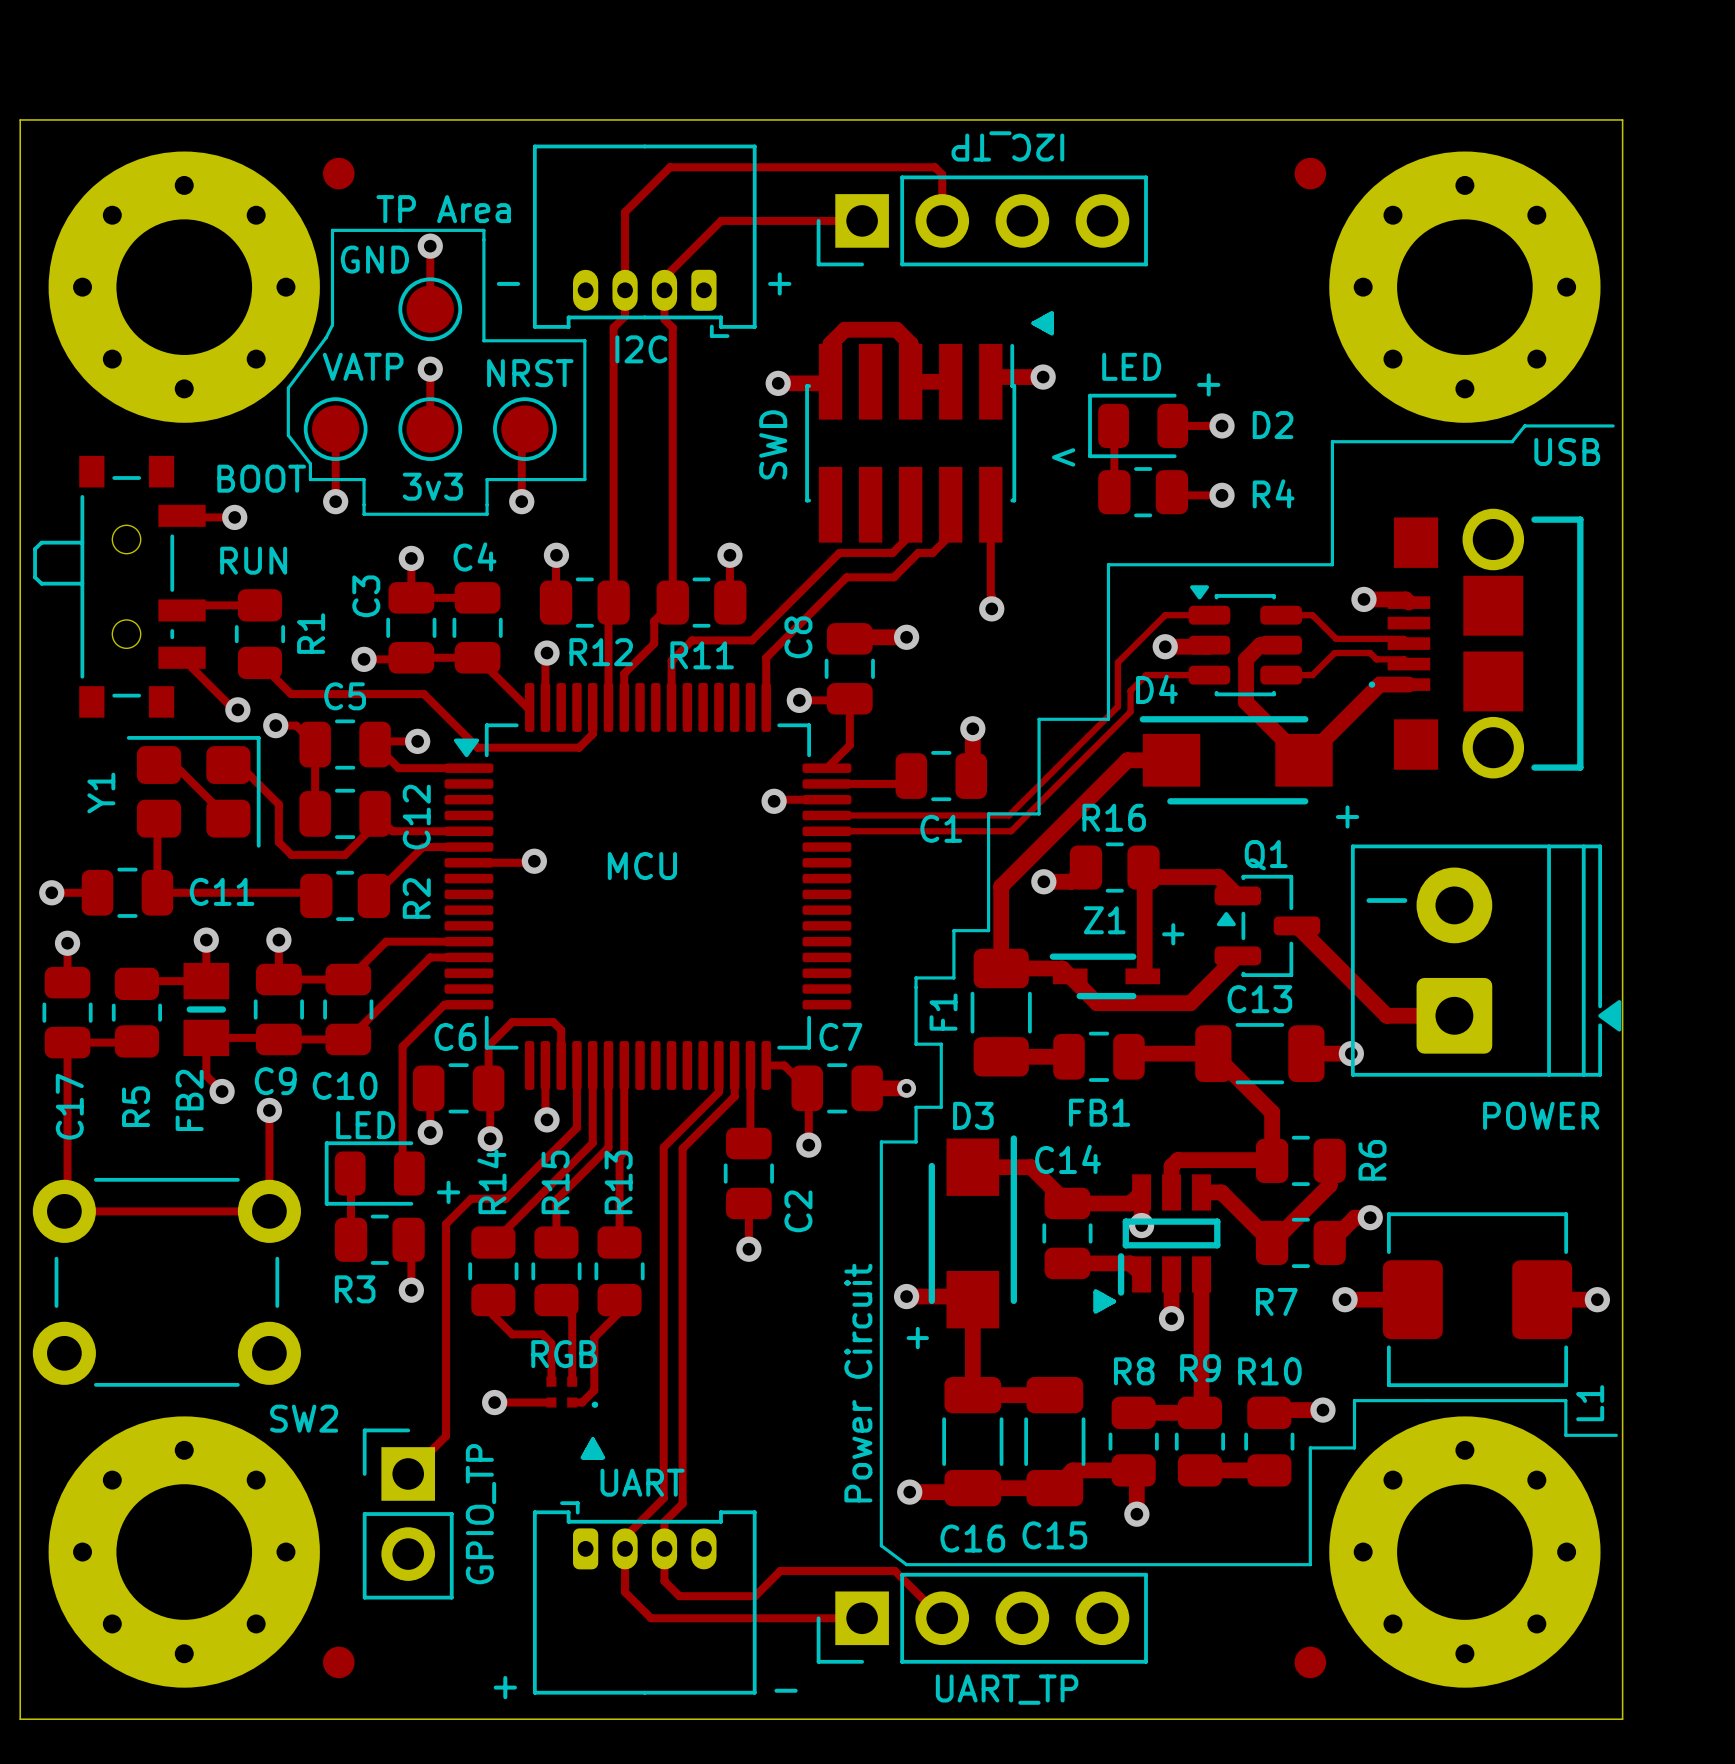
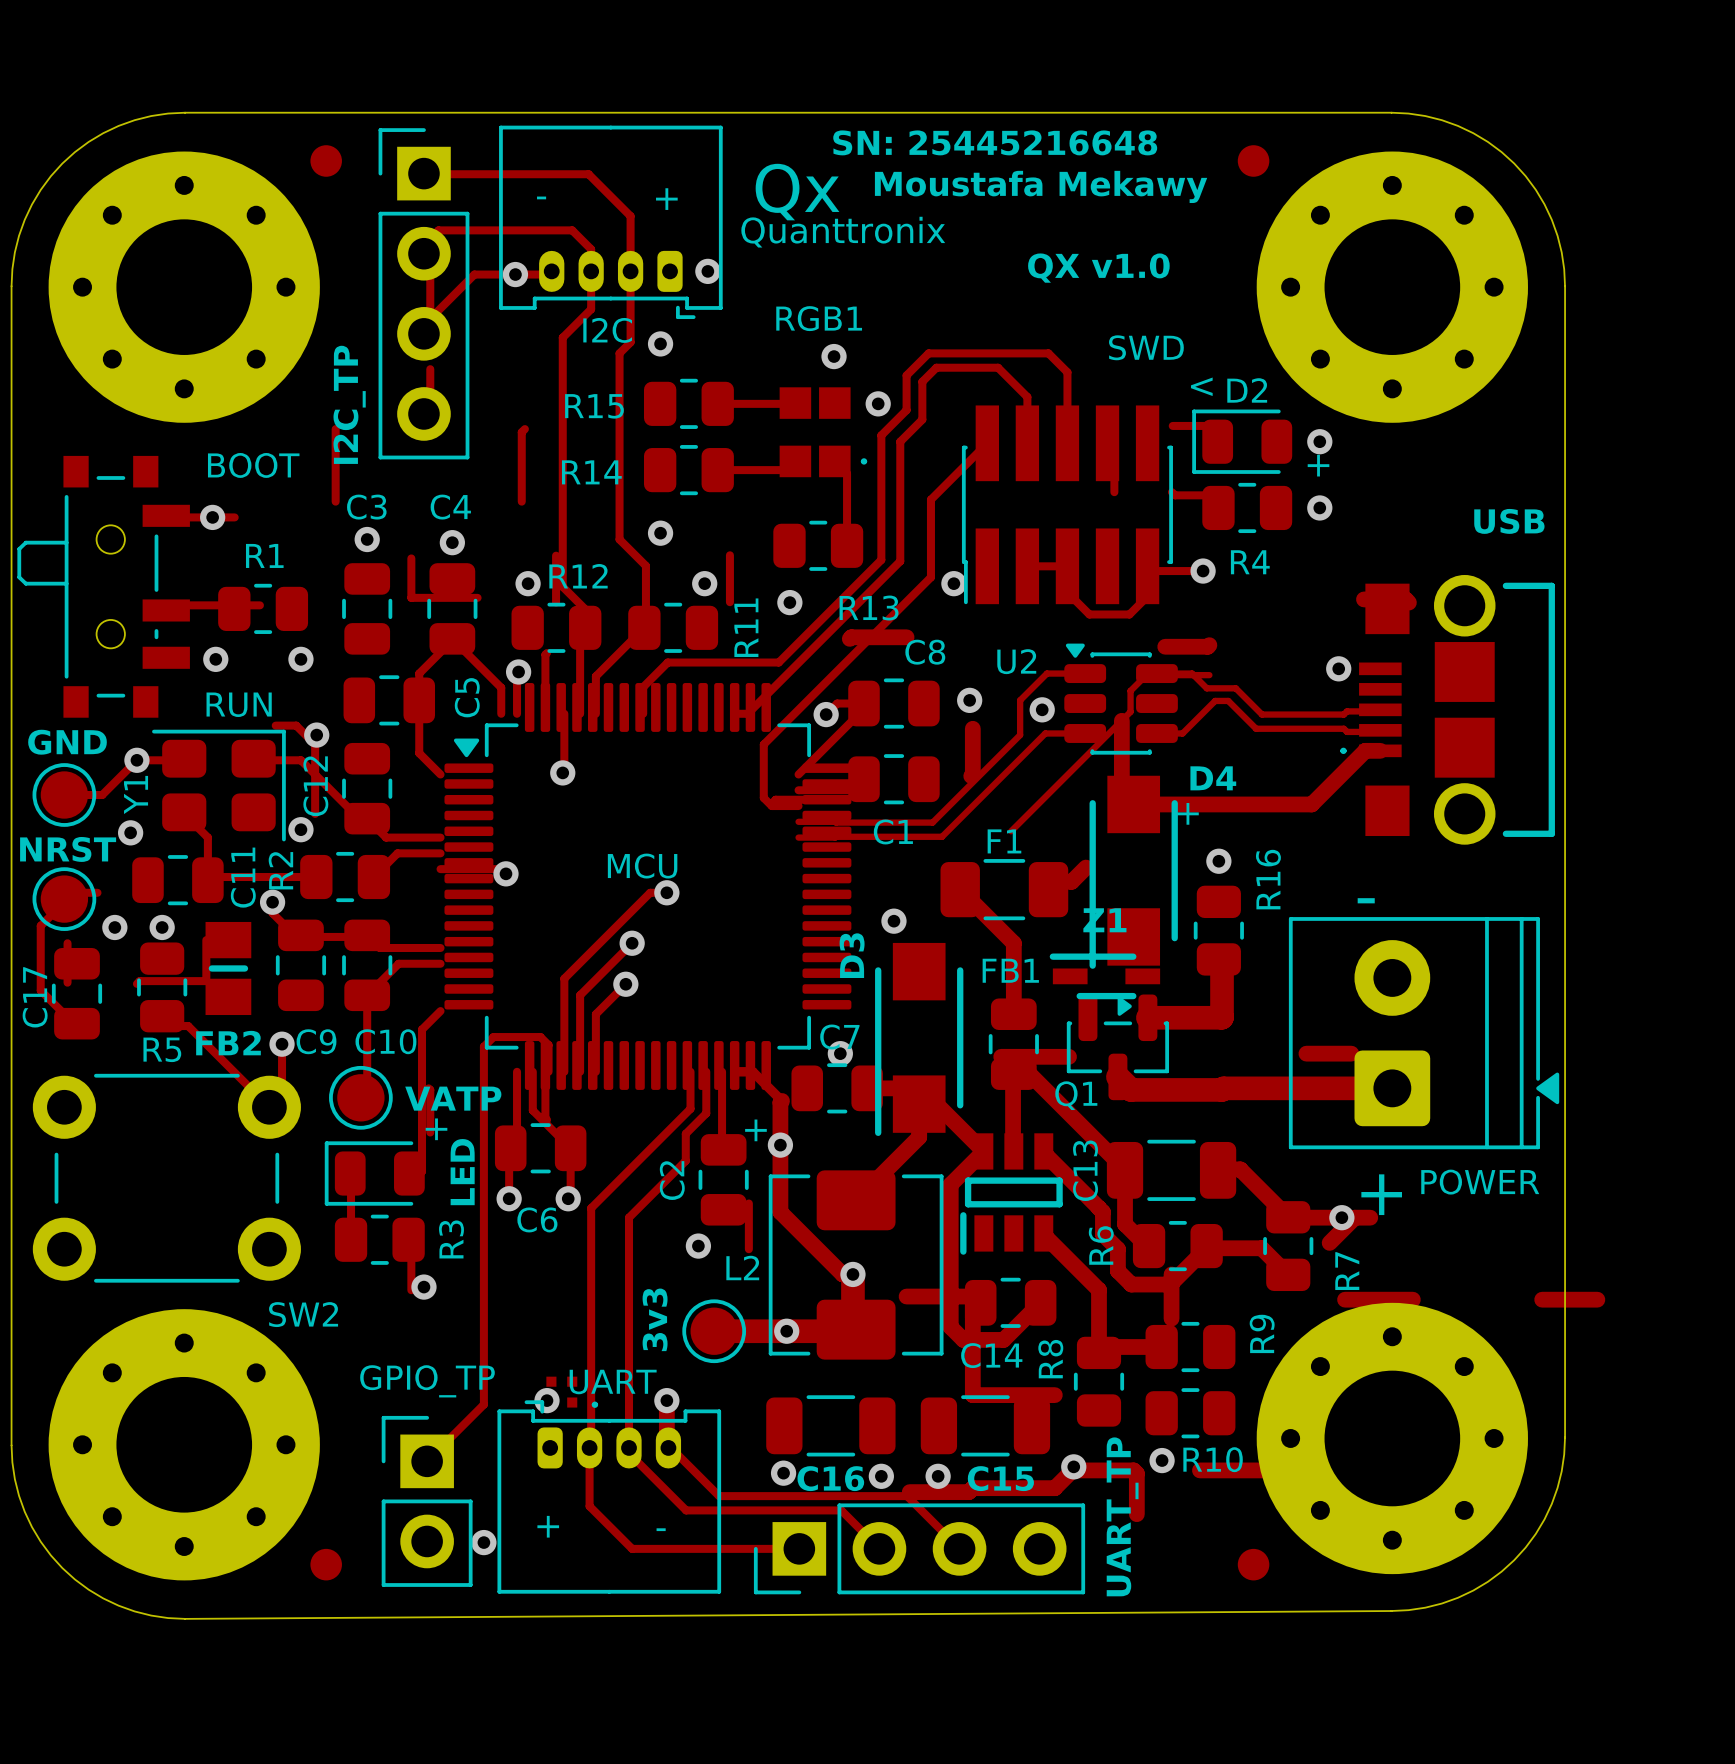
board edge: (20, 119) (1622, 119) (1622, 1719) (20, 1719) (20, 119) -> (185, 112) (168, 113) (134, 120) (103, 133) (74, 152) (50, 176) (32, 204) (19, 235) (12, 269) (11, 1445) (14, 1479) (24, 1511) (40, 1541) (62, 1568) (88, 1589) (118, 1605) (151, 1615) (185, 1618) (1391, 1611) (1425, 1607) (1457, 1597) (1487, 1581) (1514, 1560) (1535, 1533) (1551, 1503) (1561, 1471) (1565, 1437) (1565, 286) (1561, 252) (1551, 219) (1535, 189) (1514, 163) (1487, 141) (1457, 125) (1425, 116) (1391, 112) (185, 112)
text: none -> SN: 25445216648 (995, 142)
text rotation: 0° (1007, 146) -> 90° clockwise (349, 404)
text position: I2C_TP (1007, 146) -> I2C_TP (349, 404)
part position: (338, 173) -> (326, 160)
track: none -> (423, 173) (588, 174) (630, 216) (630, 342) (619, 353) (619, 539) (645, 565) (645, 623) (644, 627) (595, 676) (595, 713)
part position: (1310, 173) -> (1253, 160)
text: none -> Moustafa Mekawy (1041, 186)
text: none -> Qx (797, 192)
text: TP Area (443, 209) -> none
track: (862, 220) (721, 220) (664, 277) (664, 319) (672, 327) (672, 602) (654, 621) (654, 643) (624, 673) (624, 707) -> none
track: (942, 220) (942, 174) (934, 167) (670, 167) (625, 212) (625, 316) (613, 327) (613, 602) (608, 607) (608, 707) -> none
part: (982, 220) -> none
line: (332, 230) (483, 230) (483, 340) (584, 340) (584, 479) (487, 479) (487, 514) (364, 514) (364, 479) (310, 479) (310, 463) (288, 435) (288, 388) (326, 337) (332, 325) (332, 230) -> none
text: none -> Quanttronix (843, 232)
part position: (644, 241) -> (610, 222)
via: (430, 246) -> none
track: none -> (423, 253) (423, 244) (438, 230) (572, 230) (591, 249) (591, 309) (562, 337) (562, 586) (585, 609) (585, 627) (580, 632) (580, 713)
text position: GND (374, 259) -> GND (67, 742)
text: none -> QX v1.0 (1098, 268)
track: none -> (551, 271) (548, 274) (474, 274) (423, 325) (423, 333)
via: none -> (707, 271)
via: none -> (515, 274)
part footprint: [398, 277, 463, 342] -> [378, 128, 470, 460]
text position: - (508, 283) -> - (541, 197)
text position: + (779, 283) -> + (666, 199)
part position: (1464, 287) -> (1392, 287)
text: ▲ (1042, 323) -> none
via: none -> (660, 343)
via: none -> (834, 356)
text position: VATP (363, 366) -> VATP (453, 1098)
text: LED (1131, 366) -> none
via: (430, 369) -> none
text position: NRST (530, 373) -> NRST (68, 849)
track: (1043, 377) (995, 377) (990, 381) -> none
via: (1043, 377) -> none
track: (950, 381) (910, 381) (910, 343) (896, 329) (844, 329) (830, 343) (830, 381) (828, 383) (778, 383) -> none
via: (778, 383) -> none
text position: + (1208, 384) -> + (1318, 465)
track: none -> (795, 403) (717, 403)
via: none -> (878, 403)
D2 position: (1138, 425) -> (1242, 441)
via: (1222, 425) -> none
D2 name position: D2 (1273, 425) -> D2 (1247, 390)
line: (1613, 425) (1524, 425) (1512, 441) (1332, 441) (1332, 564) (1108, 564) (1108, 719) (1039, 719) (1039, 813) (988, 813) (988, 930) (953, 930) (953, 977) (916, 977) (916, 1044) (941, 1044) (941, 1107) (916, 1107) (916, 1141) (881, 1141) (881, 1545) (906, 1564) (1310, 1564) (1310, 1447) (1354, 1447) (1354, 1400) (1565, 1400) (1565, 1435) (1616, 1435) -> none
part: (335, 429) -> none
part: (430, 429) -> none
part: (524, 429) -> none
RGB1: none -> (823, 432)
via: none -> (1319, 441)
part: (910, 443) -> none
track: none -> (987, 443) (930, 499) (930, 577) (763, 744) (763, 797) (771, 806) (798, 806)
track: none -> (1027, 443) (1027, 397) (998, 367) (936, 367) (922, 381) (922, 419) (900, 441) (900, 561) (747, 713) (737, 713)
track: none -> (1067, 443) (1067, 372) (1048, 353) (928, 353) (906, 375) (906, 410) (881, 435) (881, 559) (778, 662) (667, 662) (643, 687) (643, 713)
text position: USB (1567, 451) -> USB (1509, 521)
text position: < (1063, 457) -> < (1201, 386)
track: none -> (795, 461) (785, 470) (717, 470)
track: none -> (834, 461) (847, 473) (847, 545)
part text position: BOOT (261, 478) -> BOOT (253, 465)
text: 3v3 (432, 486) -> none
R4 position: (1143, 492) -> (1247, 507)
R4 name position: R4 (1273, 493) -> R4 (1250, 562)
via: (1222, 495) -> none
via: (335, 501) -> none
via: (521, 501) -> none
track: (910, 504) (910, 534) (892, 552) (839, 552) (752, 640) (692, 640) (671, 660) (671, 707) -> none
track: (950, 504) (950, 534) (932, 552) (918, 552) (893, 577) (846, 577) (766, 657) (766, 707) -> none
track: (990, 504) (991, 608) -> none
part: none -> (1067, 504)
via: none -> (1319, 507)
via position: (234, 517) -> (212, 517)
via: none -> (660, 533)
via: none -> (367, 539)
via: none -> (452, 542)
via: (556, 555) -> none
via: (729, 555) -> none
C4 name position: C4 (475, 556) -> C4 (450, 507)
via: (411, 558) -> none
text position: RUN (253, 560) -> RUN (239, 704)
track: none -> (1027, 566) (1067, 566) (1067, 592) (1089, 614) (1129, 614) (1147, 596) (1147, 566) (1150, 569)
track: none -> (1150, 570) (1203, 571)
via: none -> (1203, 571)
via: none -> (528, 583)
via: none -> (704, 583)
via: none -> (953, 583)
part position: (119, 586) -> (103, 586)
C3 name rotation: 0° (366, 596) -> 90° clockwise (366, 507)
C3 name position: C3 (366, 596) -> C3 (366, 507)
via: (1363, 599) -> none
R12 position: (584, 602) -> (556, 627)
R11 position: (701, 602) -> (673, 627)
via: none -> (789, 602)
via: (991, 608) -> none
track: (1209, 615) (1165, 615) (1117, 662) (1117, 706) (1009, 815) (826, 815) -> none
track: (1281, 615) (1312, 615) (1336, 638) (1403, 638) (1408, 643) -> none
C3 position: (411, 627) -> (367, 608)
C4 position: (477, 627) -> (452, 608)
R1 name position: R1 (311, 633) -> R1 (264, 555)
R1 rotation: 0° (259, 634) -> 90° clockwise (263, 608)
via: (906, 637) -> none
part: (1245, 640) -> none
part position: (1476, 643) -> (1447, 709)
track: (1281, 645) (1260, 645) (1246, 659) (1246, 702) (1304, 760) (1379, 684) (1408, 684) -> none
via: (1165, 646) -> none
R12 name position: R12 (601, 652) -> R12 (578, 576)
via position: (546, 653) -> (518, 671)
R11 name rotation: 0° (702, 655) -> 90° counterclockwise (746, 627)
track: (182, 657) (234, 709) (237, 709) -> none
via: none -> (215, 659)
via: none -> (300, 659)
track: (364, 659) (477, 657) (527, 707) (529, 707) -> none
via: (364, 659) -> none
track: (259, 662) (291, 694) (423, 694) (477, 747) (579, 747) (592, 734) (592, 707) -> none
track: (1408, 664) (1404, 659) (1376, 659) (1370, 653) (1334, 653) (1312, 675) (1281, 675) -> none
C8 rotation: 0° (849, 668) -> 90° clockwise (893, 703)
C8 position: (849, 668) -> (893, 703)
via: none -> (1338, 668)
track: none -> (518, 671) (517, 673) (517, 713)
track: none -> (1085, 673) (1046, 673) (1020, 700) (1020, 735) (932, 822) (798, 821)
track: none -> (1156, 673) (1192, 673) (1206, 688) (1235, 688) (1262, 714) (1343, 714) (1347, 711) (1380, 709)
D4 name position: D4 (1156, 689) -> D4 (1213, 778)
C5 name rotation: 0° (345, 696) -> 90° counterclockwise (467, 697)
C5 name position: C5 (345, 696) -> C5 (467, 697)
U2: none -> (1121, 699)
track: (799, 700) (848, 700) (849, 698) (849, 745) (826, 768) -> none
via position: (799, 700) -> (826, 714)
via: (237, 709) -> none
via: none -> (1042, 709)
track: none -> (501, 713) (501, 687) (452, 638) (419, 673) (419, 753) (440, 774)
track: none -> (564, 713) (564, 771) (562, 772)
track: none -> (826, 714) (837, 703) (864, 703) (864, 709) (798, 774)
track: none -> (1121, 720) (1121, 792) (1133, 804) (1311, 804) (1365, 750) (1380, 750)
via: (275, 725) -> none
via position: (972, 728) -> (969, 700)
track: none -> (1380, 730) (1347, 731) (1343, 728) (1256, 728) (1228, 700) (1215, 700) (1182, 733) (1156, 733)
track: none -> (1085, 733) (1045, 733) (942, 836) (798, 837)
via: none -> (316, 735)
track: (417, 741) (378, 741) (375, 744) (398, 768) (468, 768) -> none
via: (417, 741) -> none
C5 position: (345, 744) -> (389, 700)
track: none -> (184, 758) (182, 760) (136, 760) (102, 795) (64, 795)
track: none -> (253, 758) (300, 760) (359, 818) (367, 818) (386, 837) (440, 837)
via: none -> (136, 760)
track: (1171, 760) (1127, 760) (1001, 886) (1001, 968) (1062, 968) (1097, 1003) (1190, 1003) (1237, 955) -> none
D4 rotation: 0° (1236, 760) -> 90° counterclockwise (1133, 872)
D4 position: (1236, 760) -> (1133, 872)
track: (159, 765) (174, 765) (228, 818) -> none
track: (228, 765) (239, 765) (278, 804) (278, 842) (291, 854) (345, 854) (375, 824) (375, 813) (392, 831) (468, 831) -> none
via: none -> (562, 772)
track: (911, 776) (903, 783) (826, 783) -> none
C1 position: (941, 776) -> (893, 779)
track: none -> (864, 779) (852, 790) (798, 790)
Y1 position: (193, 791) -> (218, 785)
Y1 name position: Y1 (101, 792) -> Y1 (136, 794)
part: none -> (64, 795)
via: (774, 801) -> none
track: none -> (184, 812) (207, 837) (207, 880) (211, 877) (316, 877)
C12 rotation: 0° (345, 813) -> 90° clockwise (367, 788)
text: none -> + (1187, 813)
C12 name position: C12 (416, 817) -> C12 (315, 786)
text: + (1347, 817) -> none
track: (159, 818) (157, 820) (157, 892) (313, 892) (316, 895) -> none
via: none -> (300, 829)
track: (826, 831) (1011, 831) -> none
via: none -> (130, 832)
track: (468, 847) (422, 847) (373, 895) -> none
track: none -> (440, 853) (397, 853) (373, 877)
Q1 name position: Q1 (1266, 855) -> Q1 (1076, 1095)
track: (534, 861) (532, 862) (468, 862) -> none
via position: (534, 861) -> (505, 873)
via: none -> (1218, 861)
R16 rotation: 0° (1114, 867) -> 90° clockwise (1218, 930)
R16 position: (1114, 867) -> (1218, 930)
track: (1143, 867) (1153, 877) (1218, 877) (1237, 895) -> none
track: (1144, 868) (1144, 974) (1142, 976) -> none
track: none -> (440, 869) (501, 869) (505, 873)
via: (1043, 881) -> none
track: none -> (960, 889) (1013, 943) (1013, 1014)
C11 name rotation: 0° (222, 891) -> 90° counterclockwise (243, 877)
via: (51, 892) -> none
C11 position: (127, 892) -> (177, 880)
track: none -> (666, 892) (650, 892) (564, 978) (564, 1071)
via: none -> (666, 892)
R2 position: (345, 895) -> (345, 877)
R2 name position: R2 (416, 898) -> R2 (280, 870)
track: none -> (64, 899) (64, 902) (40, 925) (40, 990) (67, 1017) (70, 1017) (77, 1023)
part: none -> (64, 899)
track: none -> (272, 902) (272, 913) (294, 935) (302, 936) (367, 935) (379, 947) (440, 947)
via: none -> (272, 902)
via: none -> (893, 921)
Q1 rotation: 0° (1267, 925) -> 90° clockwise (1117, 1047)
Q1 position: (1267, 925) -> (1117, 1047)
track: (1296, 925) (1386, 1015) (1454, 1015) -> none
via: none -> (114, 927)
via: none -> (162, 927)
text: + (1173, 934) -> none
via: (206, 940) -> none
track: (278, 940) (278, 979) (348, 979) (386, 941) (468, 941) -> none
via: (278, 940) -> none
via: (67, 943) -> none
track: none -> (632, 943) (580, 995) (580, 1071)
via: none -> (632, 943)
track: (468, 957) (430, 957) (348, 1039) (206, 1037) (206, 1075) (222, 1091) -> none
track: none -> (1218, 959) (1222, 962) (1222, 1017)
part: (1486, 960) -> none
track: none -> (440, 963) (398, 963) (367, 995) (367, 1091) (360, 1097)
track: none -> (624, 984) (625, 984) (595, 1014) (595, 1071)
via: none -> (625, 984)
C13 name rotation: 0° (1259, 999) -> 90° counterclockwise (1085, 1170)
C13 name position: C13 (1259, 999) -> C13 (1085, 1170)
track: (468, 1004) (444, 1004) (402, 1046) (402, 1166) (409, 1173) -> none
FB2 position: (206, 1009) -> (228, 968)
C9 position: (278, 1009) -> (300, 965)
C10 position: (348, 1009) -> (367, 965)
track: none -> (440, 1011) (422, 1029) (422, 1171) (420, 1173)
C17 position: (67, 1012) -> (77, 993)
R5 position: (136, 1012) -> (162, 987)
F1 rotation: 0° (1001, 1012) -> 90° clockwise (1004, 889)
F1 position: (1001, 1012) -> (1004, 889)
track: none -> (1147, 1017) (1221, 1017)
track: none -> (165, 1026) (188, 1026) (269, 1107) (282, 1094) (282, 1044)
part: none -> (1424, 1033)
C6 name position: C6 (455, 1036) -> C6 (537, 1219)
track: (136, 1041) (67, 1042) (67, 1186) (64, 1189) (64, 1211) (269, 1211) (269, 1110) -> none
via: none -> (282, 1044)
via: none -> (840, 1053)
C13 position: (1259, 1053) -> (1171, 1170)
via: (1351, 1053) -> none
FB1 rotation: 0° (1099, 1056) -> 90° clockwise (1013, 1044)
FB1 position: (1099, 1056) -> (1013, 1044)
track: (1128, 1056) (1132, 1053) (1213, 1053) (1272, 1112) (1272, 1160) (1177, 1160) (1171, 1166) (1171, 1192) -> none
track: (561, 1065) (561, 1030) (553, 1022) (512, 1022) (488, 1045) (490, 1138) -> none
track: (576, 1065) (576, 1127) (505, 1198) (471, 1198) (446, 1223) (446, 1436) (408, 1473) -> none
track: (592, 1065) (592, 1143) (493, 1242) -> none
track: (608, 1065) (608, 1147) (556, 1199) (556, 1242) -> none
track: (624, 1065) (624, 1152) (619, 1156) (619, 1242) -> none
track: (718, 1065) (718, 1092) (663, 1147) (663, 1498) (625, 1537) (625, 1592) (651, 1618) (862, 1618) -> none
track: (734, 1065) (734, 1096) (682, 1148) (682, 1503) (664, 1521) (664, 1581) (679, 1596) (755, 1596) (780, 1570) (894, 1570) (942, 1618) -> none
track: (750, 1065) (750, 1141) (748, 1143) -> none
track: (766, 1065) (784, 1065) (808, 1089) (808, 1145) -> none
track: none -> (517, 1071) (517, 1141) (509, 1149) (509, 1198)
track: none -> (532, 1071) (532, 1110) (570, 1148) (570, 1196) (568, 1198)
track: none -> (548, 1071) (548, 1045) (540, 1037) (493, 1037) (483, 1046) (483, 1404) (427, 1461)
track: none -> (690, 1071) (690, 1108) (591, 1208) (589, 1506) (632, 1548) (799, 1548)
track: none -> (706, 1071) (706, 1113) (685, 1133) (685, 1160) (629, 1217) (629, 1451) (686, 1510) (841, 1510) (876, 1545)
track: none -> (722, 1071) (722, 1148) (723, 1149)
track: none -> (737, 1071) (752, 1071) (781, 1100) (780, 1102) (780, 1212) (842, 1274) (852, 1274) (852, 1323) (856, 1329) (850, 1331) (714, 1331)
track: none -> (1117, 1076) (1130, 1089) (1392, 1088)
C9 name position: C9 (275, 1081) -> C9 (316, 1041)
C10 name position: C10 (345, 1085) -> C10 (385, 1041)
C6 position: (458, 1088) -> (540, 1148)
via: (906, 1088) -> none
via: (222, 1091) -> none
part: none -> (360, 1097)
FB2 name rotation: 0° (189, 1100) -> 90° clockwise (228, 1043)
C17 name position: C17 (69, 1106) -> C17 (35, 997)
R5 name rotation: 0° (136, 1106) -> 90° clockwise (162, 1049)
via: (269, 1110) -> none
FB1 name position: FB1 (1099, 1112) -> FB1 (1010, 970)
D3 name position: D3 (973, 1115) -> D3 (852, 955)
via: (546, 1119) -> none
text rotation: 0° (365, 1125) -> 90° counterclockwise (462, 1172)
text position: LED (365, 1125) -> LED (462, 1172)
text: none -> + (755, 1130)
via: (430, 1132) -> none
via: (490, 1138) -> none
via position: (808, 1145) -> (780, 1145)
track: none -> (1013, 1151) (1013, 1074) (1029, 1074) (1125, 1170) (1125, 1224) (1149, 1246)
track: none -> (1043, 1151) (1102, 1212) (1102, 1234) (1117, 1249) (1117, 1271) (1131, 1284) (1170, 1284) (1206, 1248) (1206, 1246) (1211, 1248) (1261, 1248) (1288, 1274)
C14 name position: C14 (1068, 1159) -> C14 (991, 1355)
R6 position: (1300, 1160) -> (1177, 1246)
track: (1329, 1160) (1329, 1185) (1272, 1242) (1221, 1192) (1201, 1192) -> none
R6 name position: R6 (1372, 1160) -> R6 (1101, 1245)
track: (972, 1167) (1031, 1167) (1067, 1203) (1130, 1203) (1141, 1192) (1141, 1225) -> none
track: none -> (1218, 1170) (1240, 1169) (1288, 1217) (1341, 1217)
C2 position: (748, 1173) -> (723, 1179)
R14 name position: R14 (491, 1181) -> R14 (591, 472)
R15 name position: R15 (555, 1182) -> R15 (594, 406)
R13 name position: R13 (618, 1182) -> R13 (869, 608)
text position: + (448, 1192) -> + (436, 1129)
text: none -> + (1381, 1194)
via: none -> (509, 1198)
via: none -> (568, 1198)
track: none -> (856, 1200) (919, 1137) (919, 1104) (936, 1104) (983, 1151) (950, 1184) (950, 1327) (963, 1339) (1003, 1339) (1040, 1302)
C2 name position: C2 (798, 1211) -> C2 (672, 1180)
via position: (1370, 1217) -> (1341, 1217)
via: (1141, 1225) -> none
D3 rotation: 0° (972, 1231) -> 180° (919, 1039)
D3 position: (972, 1231) -> (919, 1039)
track: none -> (1043, 1233) (1099, 1290) (1099, 1352) (1104, 1347) (1161, 1347)
C14 rotation: 0° (1067, 1233) -> 90° clockwise (1010, 1302)
C14 position: (1067, 1233) -> (1010, 1302)
part position: (1169, 1235) -> (1011, 1194)
R7 rotation: 0° (1300, 1242) -> 90° clockwise (1288, 1246)
via: none -> (698, 1246)
via: (748, 1249) -> none
track: (1067, 1263) (1130, 1263) (1141, 1274) -> none
L2: none -> (856, 1264)
R14 rotation: 0° (493, 1271) -> 90° clockwise (688, 470)
R14 position: (493, 1271) -> (688, 470)
R15 rotation: 0° (556, 1271) -> 90° clockwise (688, 403)
R15 position: (556, 1271) -> (688, 403)
R13 rotation: 0° (619, 1271) -> 90° clockwise (818, 545)
R13 position: (619, 1271) -> (818, 545)
via: none -> (852, 1274)
track: (1201, 1274) (1201, 1411) (1199, 1412) (1133, 1412) -> none
SW2 position: (166, 1282) -> (166, 1178)
R3 name rotation: 0° (355, 1289) -> 90° counterclockwise (451, 1239)
R3 name position: R3 (355, 1289) -> R3 (451, 1239)
via position: (411, 1290) -> (423, 1287)
via: (906, 1296) -> none
via: (1345, 1299) -> none
L1: (1477, 1299) -> none
via: (1597, 1299) -> none
track: (493, 1300) (493, 1315) (512, 1334) (542, 1334) (551, 1343) (551, 1381) -> none
track: (556, 1300) (572, 1315) (572, 1381) -> none
track: (619, 1300) (619, 1312) (594, 1337) (594, 1390) (582, 1402) (572, 1402) -> none
text: ▲ (1104, 1301) -> none
R7 name position: R7 (1276, 1301) -> R7 (1347, 1271)
via: (1171, 1318) -> none
text: none -> 3v3 (655, 1319)
part: none -> (714, 1331)
via: none -> (786, 1331)
text: + (917, 1338) -> none
text: RGB (564, 1354) -> none
R8 name rotation: 0° (1134, 1371) -> 90° counterclockwise (1050, 1359)
R8 name position: R8 (1134, 1371) -> R8 (1050, 1359)
R10 name position: R10 (1269, 1371) -> R10 (1213, 1459)
text: Power Circuit (858, 1383) -> none
track: none -> (666, 1400) (668, 1447) (674, 1451) (719, 1496) (907, 1496) (956, 1545)
via: none -> (666, 1400)
track: (494, 1402) (551, 1402) -> none
via position: (494, 1402) -> (546, 1400)
via: (1322, 1410) -> none
C16 rotation: 0° (972, 1441) -> 90° clockwise (830, 1425)
C16 position: (972, 1441) -> (830, 1425)
C15 rotation: 0° (1054, 1441) -> 90° clockwise (985, 1425)
R8 position: (1133, 1441) -> (1099, 1381)
R9 rotation: 0° (1199, 1441) -> 90° clockwise (1190, 1347)
R9 position: (1199, 1441) -> (1190, 1347)
R10 rotation: 0° (1269, 1441) -> 90° clockwise (1190, 1413)
R10 position: (1269, 1441) -> (1190, 1413)
text: ▲ (592, 1448) -> none
via: none -> (1162, 1460)
via: none -> (1073, 1466)
via: none -> (783, 1473)
via: none -> (881, 1476)
via: none -> (938, 1476)
via: (909, 1492) -> none
part: none -> (609, 1496)
part position: (408, 1514) -> (427, 1501)
text rotation: 0° (481, 1514) -> 90° clockwise (427, 1381)
via: (1136, 1514) -> none
via: none -> (483, 1542)
part position: (184, 1552) -> (184, 1444)
part position: (1464, 1552) -> (1392, 1438)
part: (644, 1597) -> none
part position: (982, 1618) -> (919, 1548)
part position: (338, 1662) -> (326, 1564)
part position: (1310, 1662) -> (1253, 1564)
text position: + (505, 1687) -> + (548, 1526)
text rotation: 0° (1007, 1689) -> 90° counterclockwise (1122, 1516)
text position: UART_TP (1007, 1689) -> UART_TP (1122, 1516)
text position: - (786, 1690) -> - (661, 1529)

